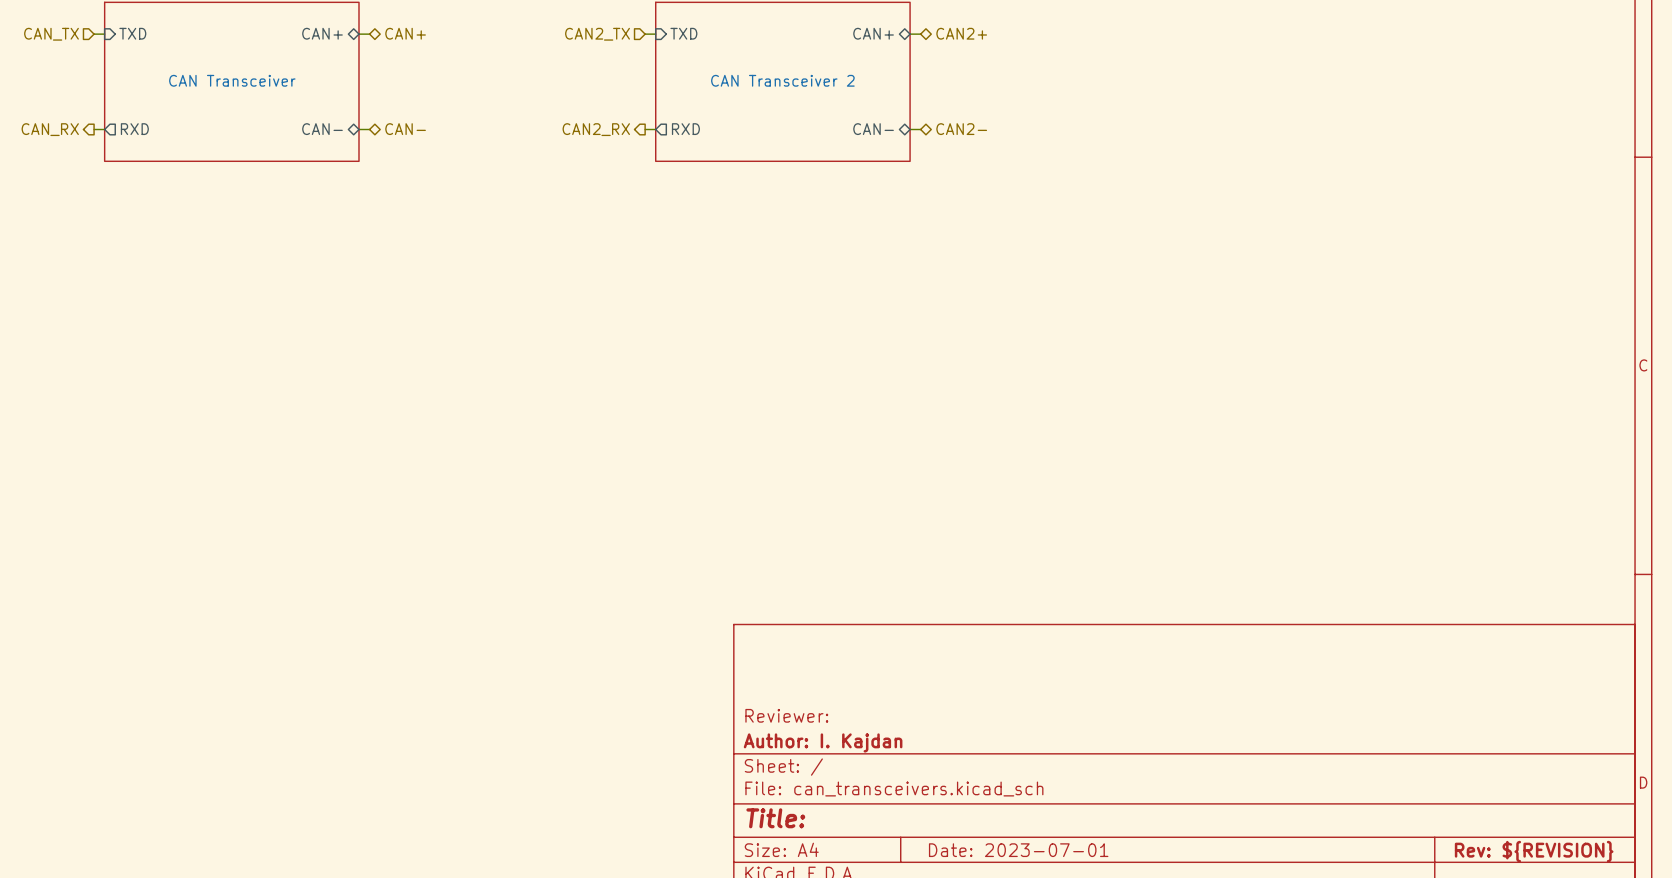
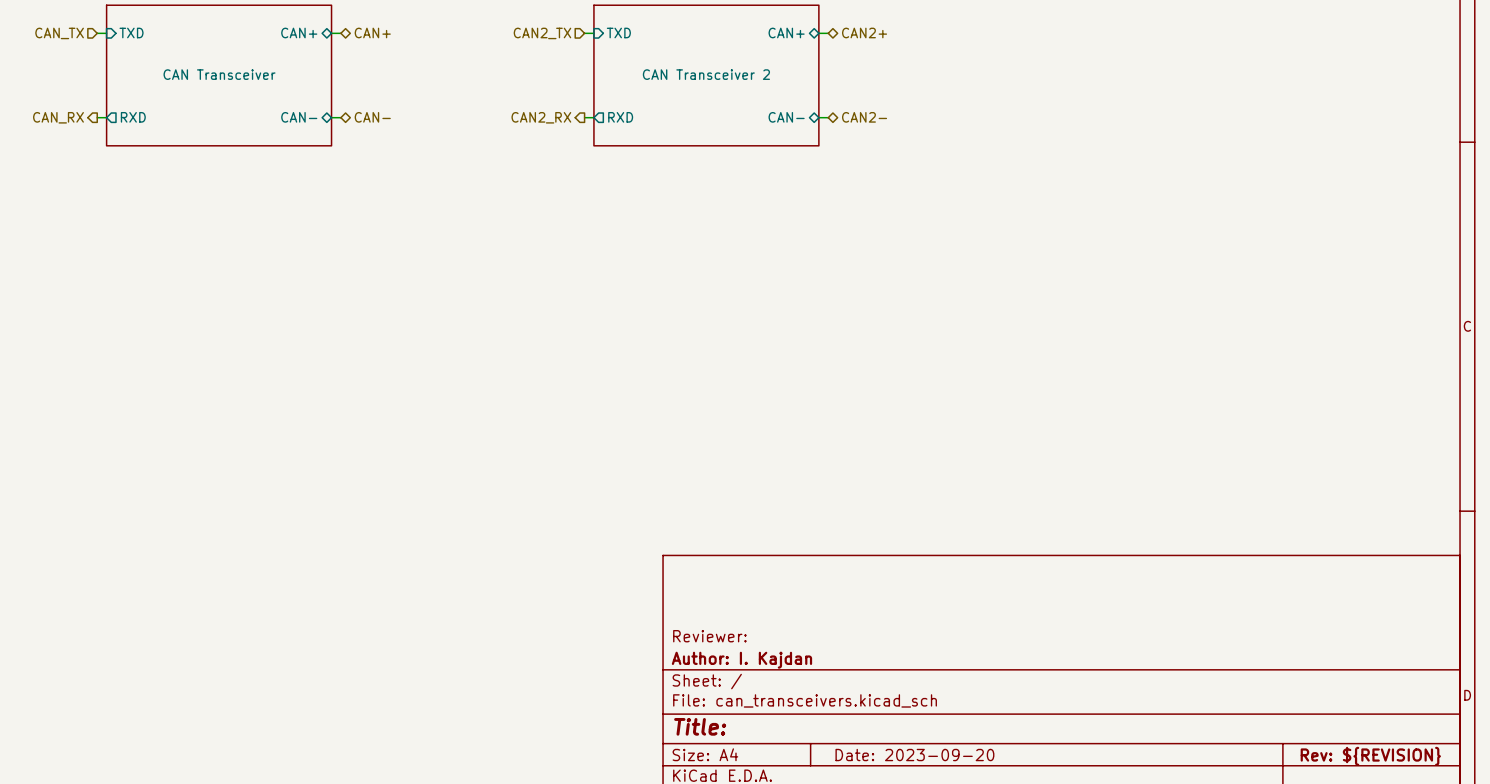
title block: Date: 2023-07-01 (1018, 850) -> Date: 2023-09-20 (914, 755)

